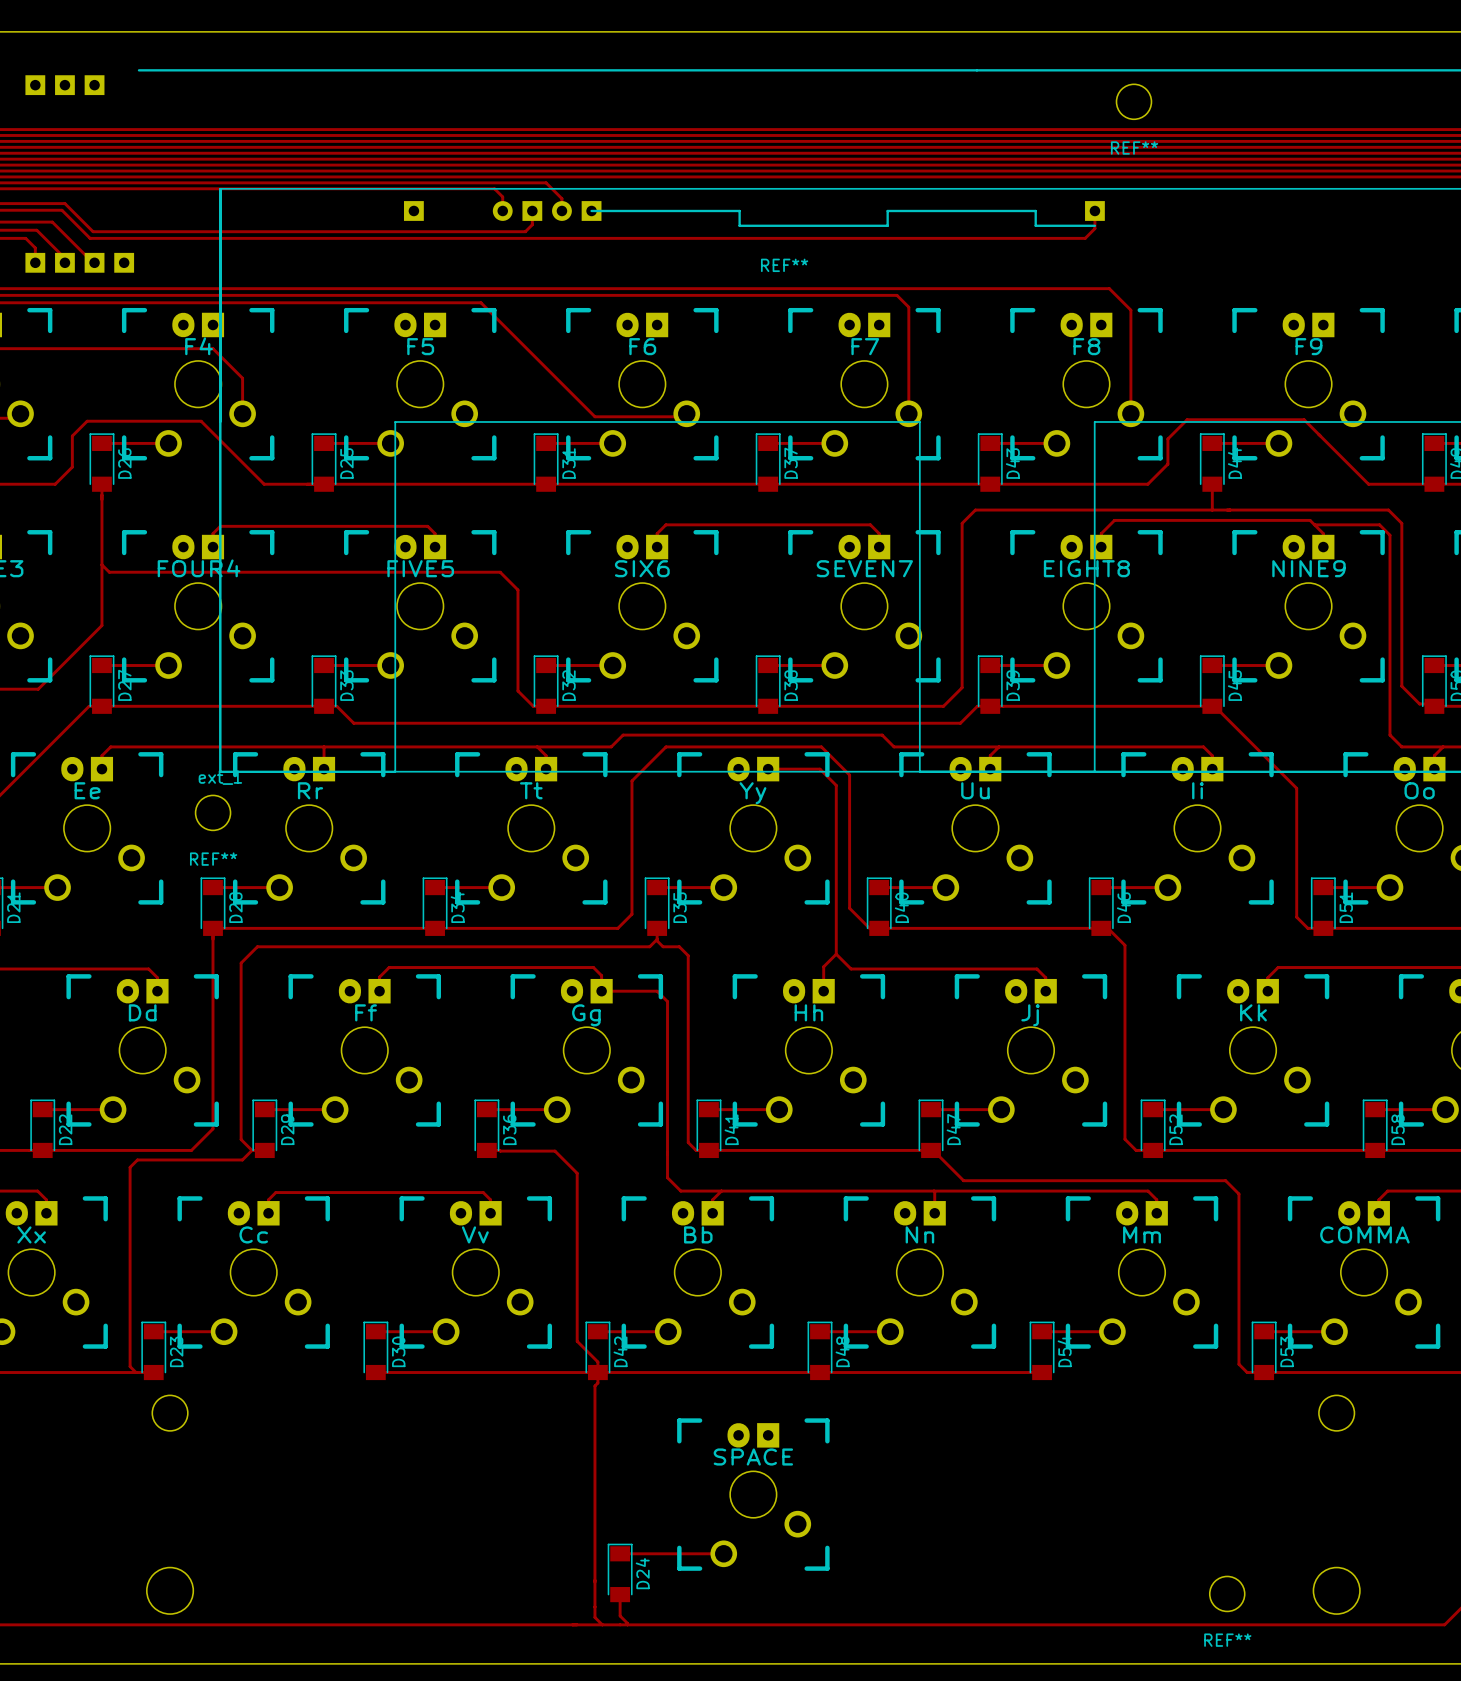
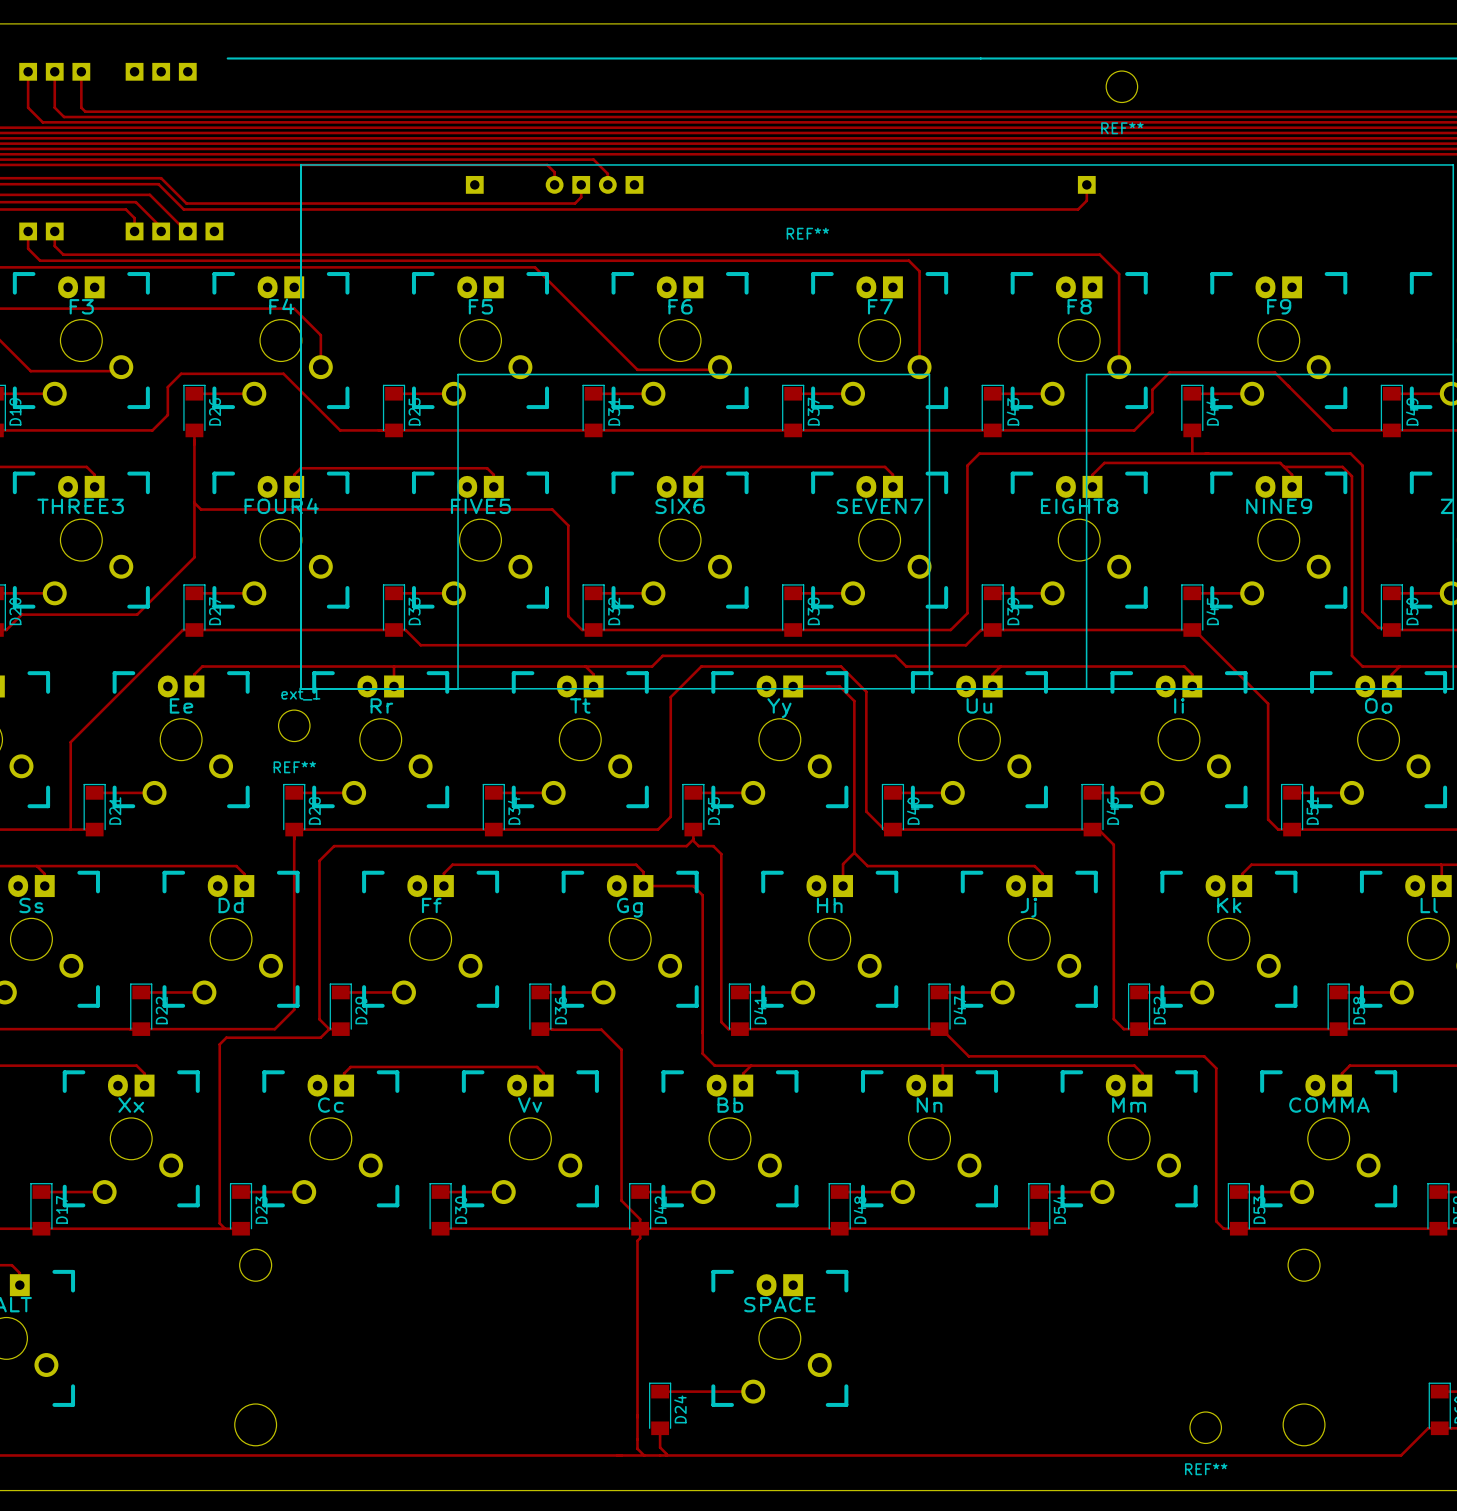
line: (591, 210) (739, 210) (739, 225) (887, 225) (887, 210) (1035, 210) (1035, 225) (1094, 225) -> none

